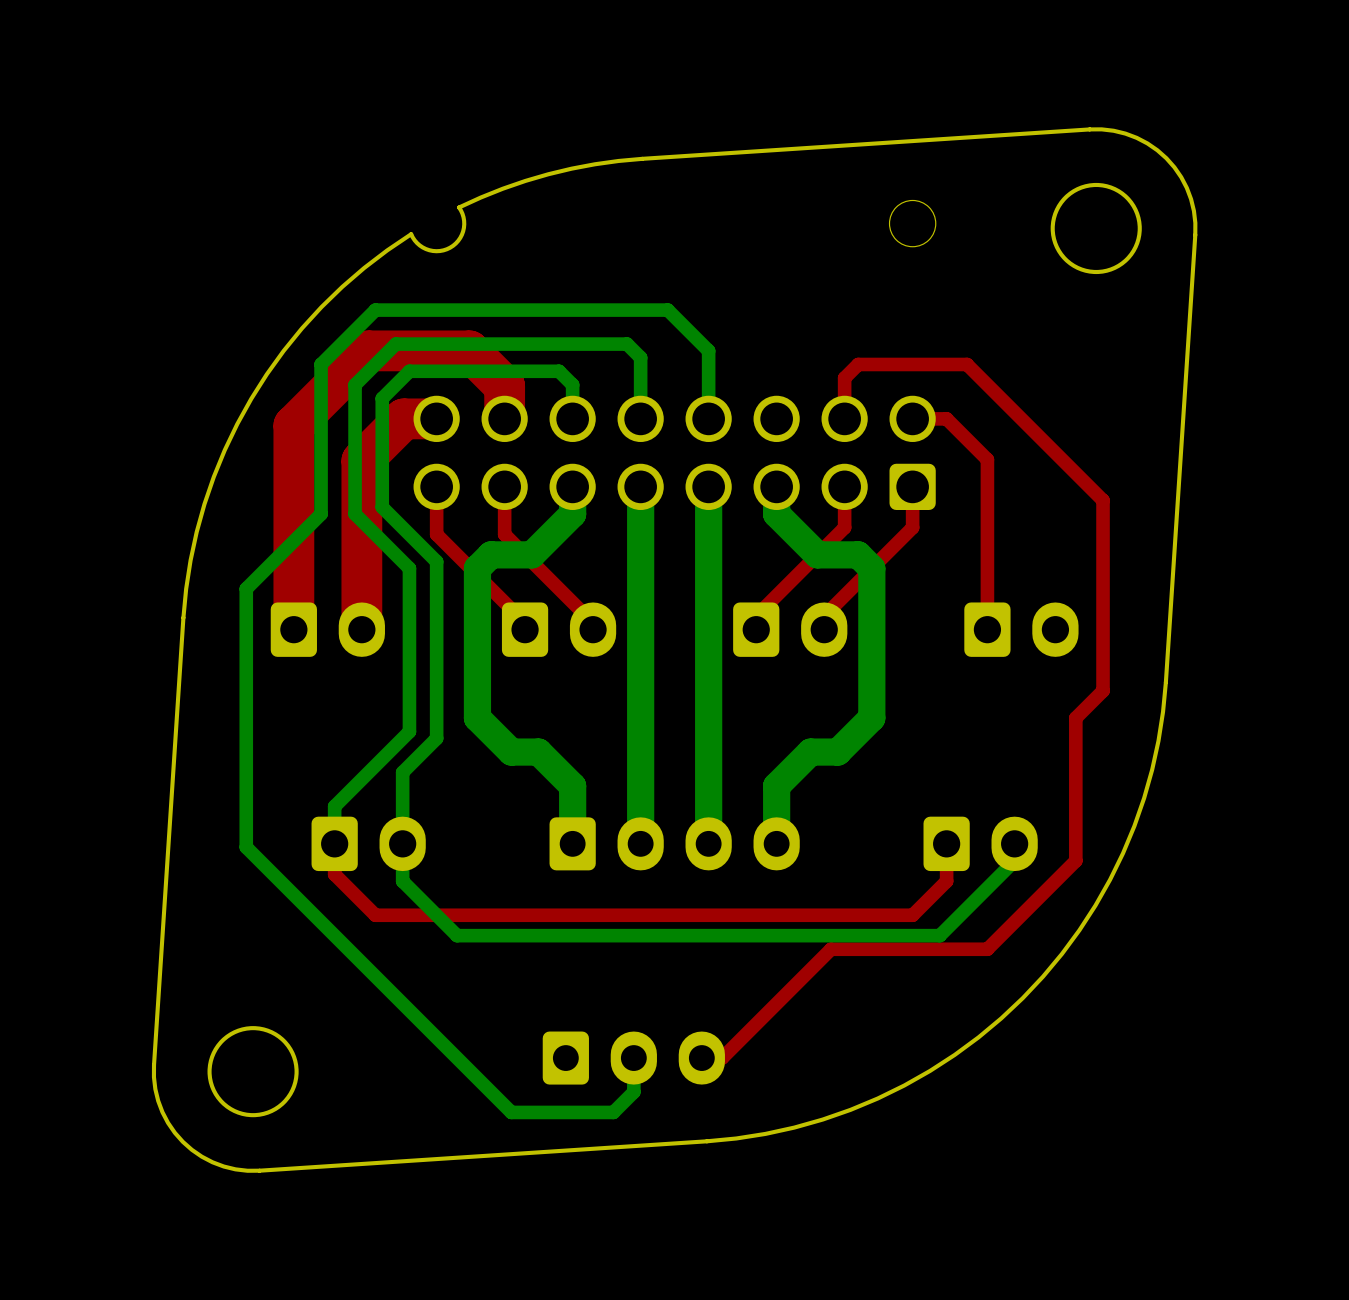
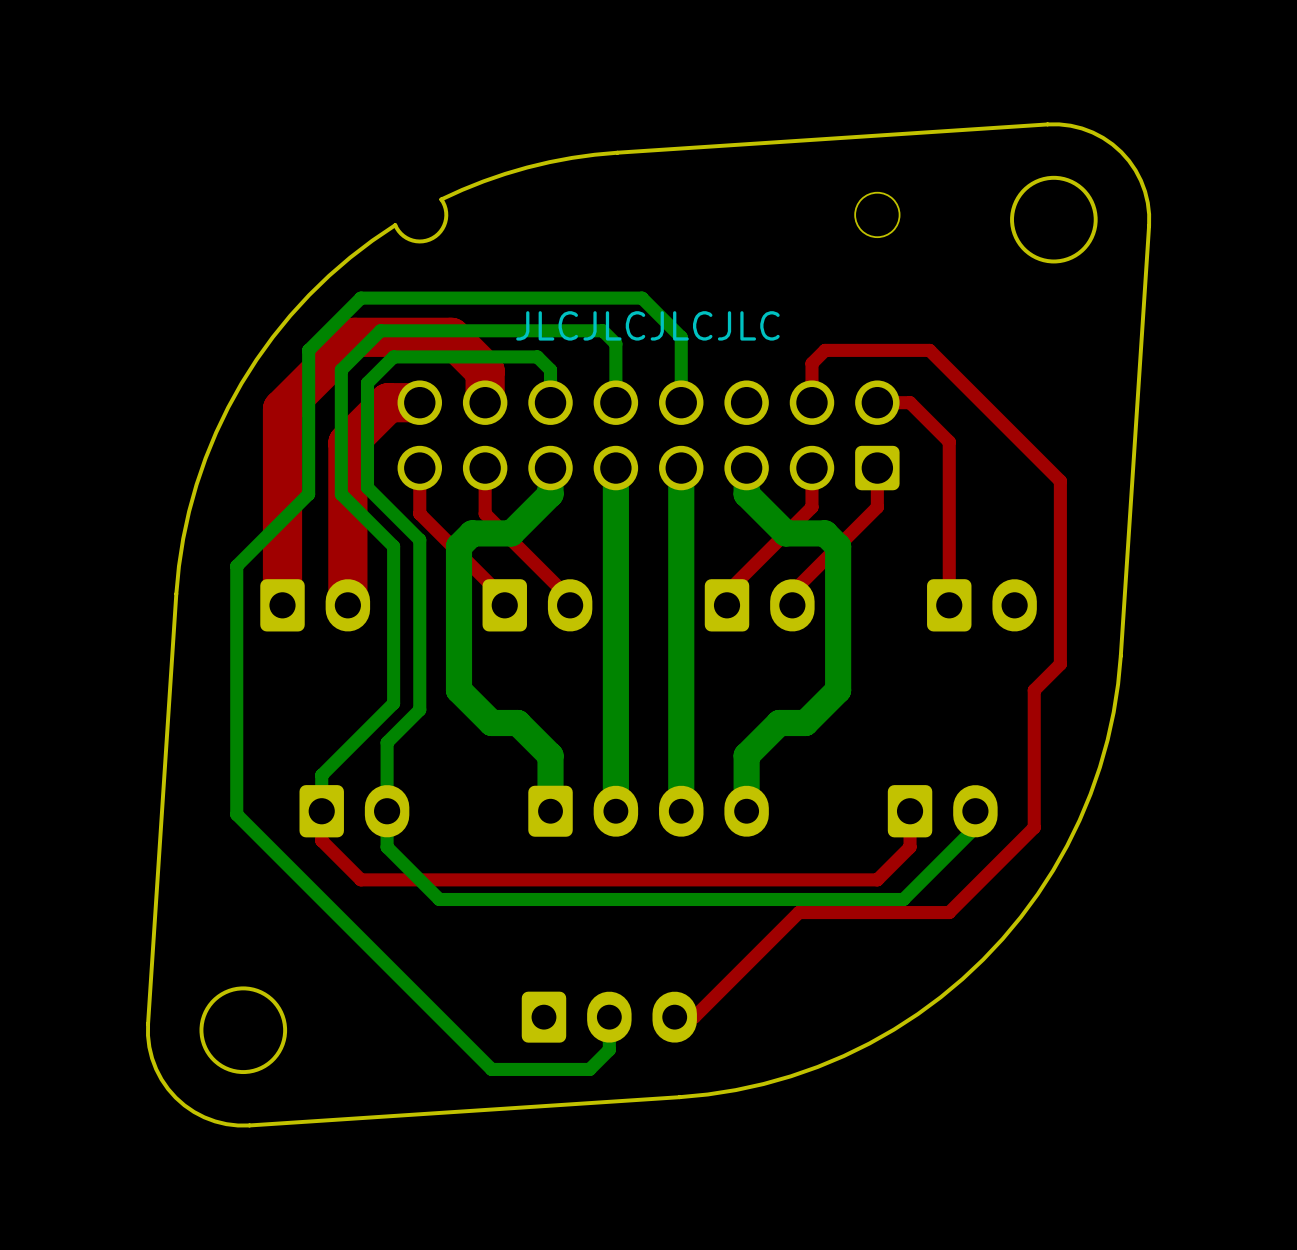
text: none -> JLCJLCJLCJLC (647, 325)

